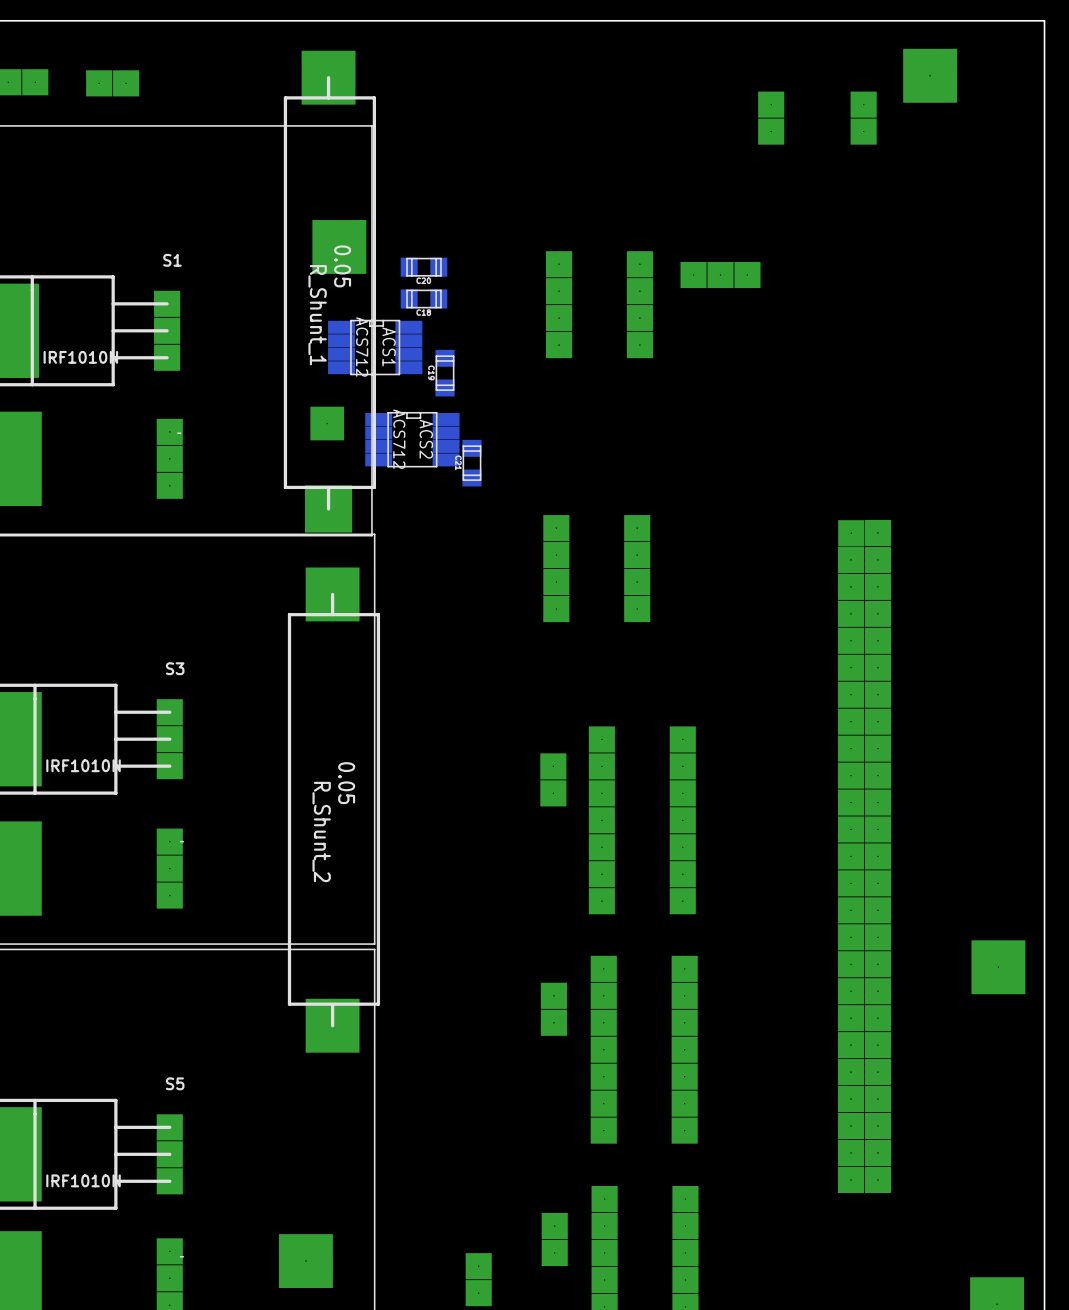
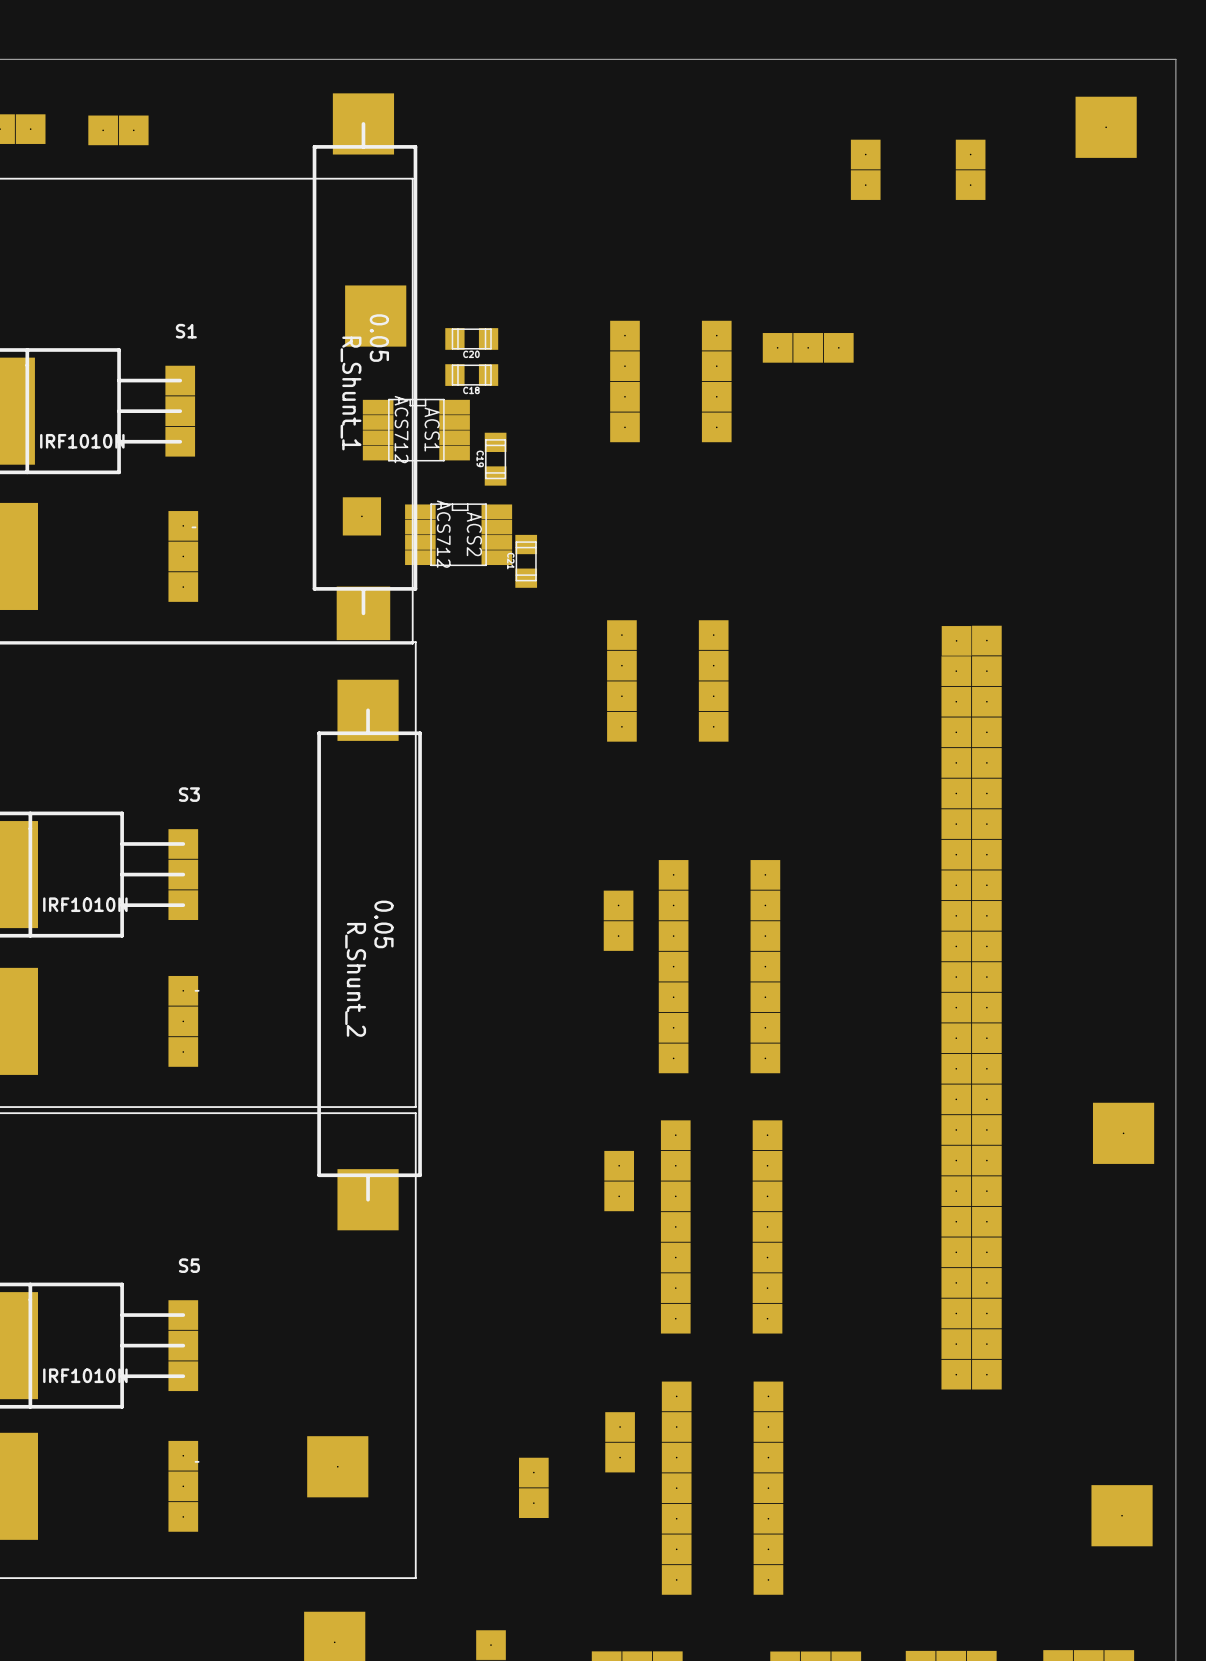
part position: (930, 75) -> (1106, 127)

